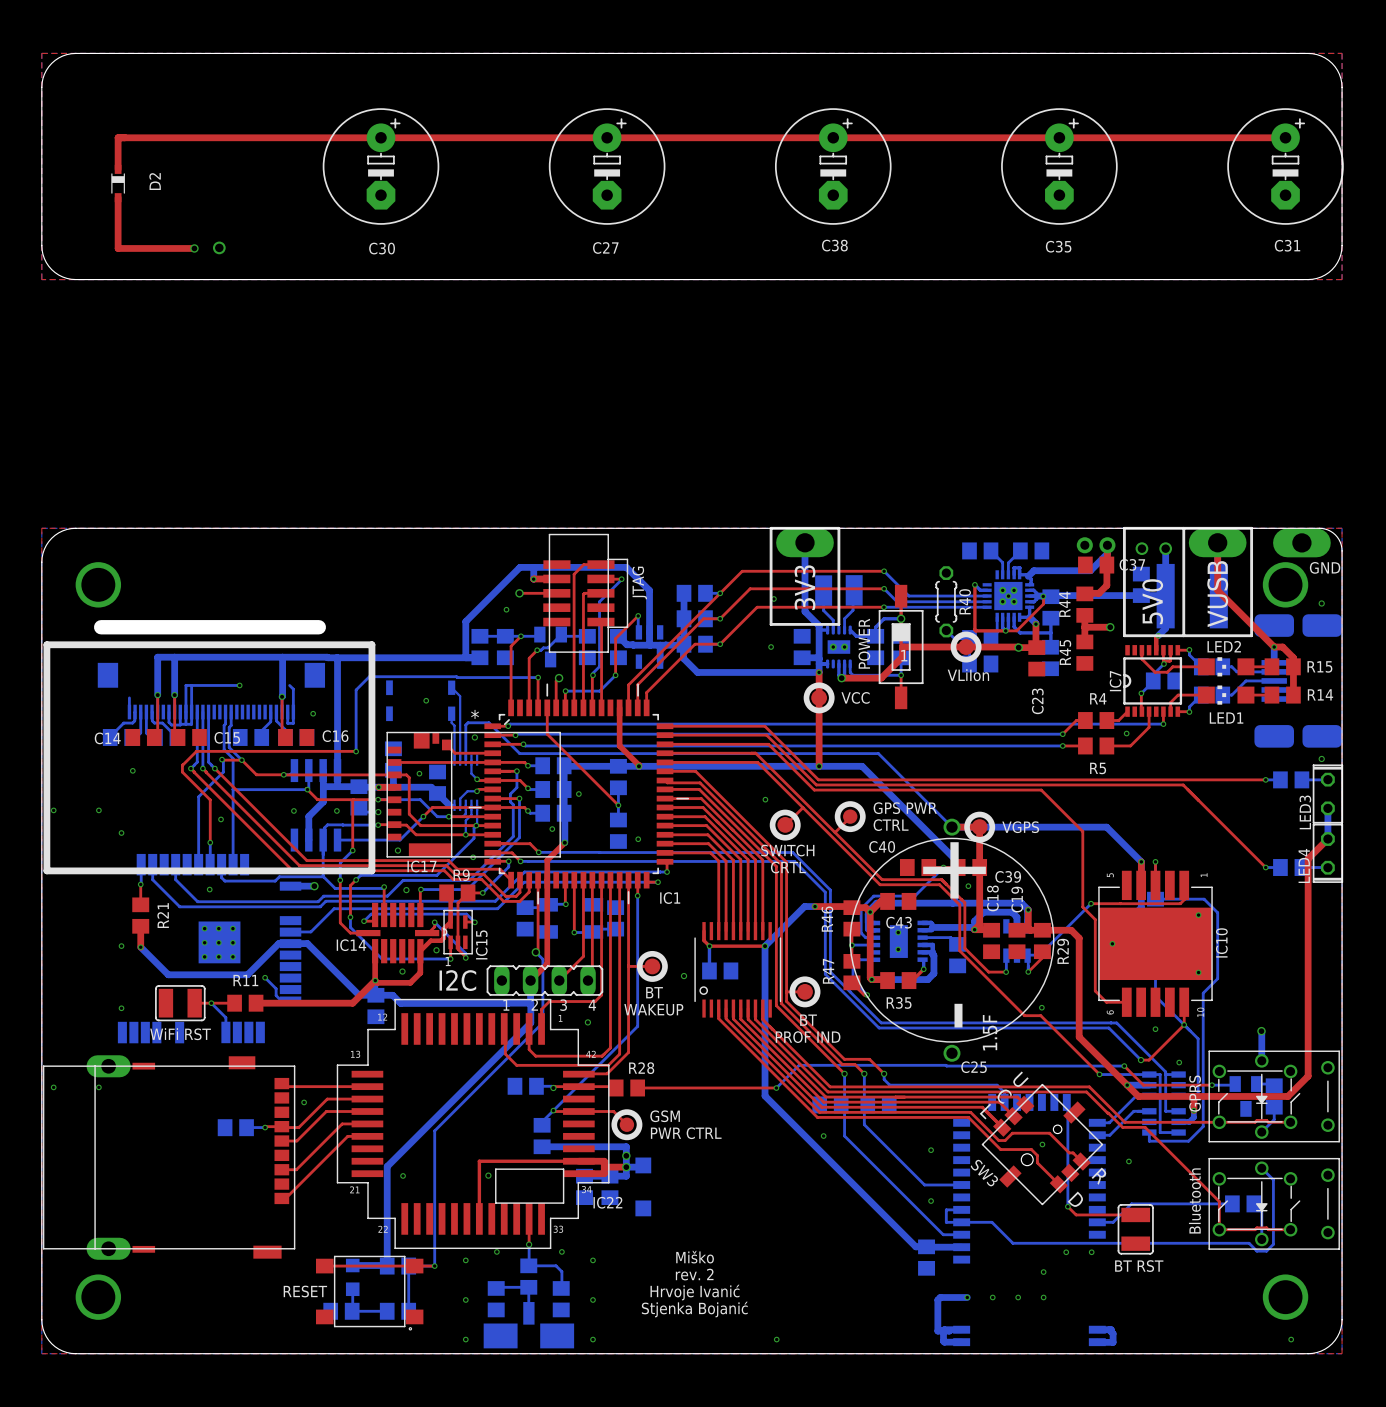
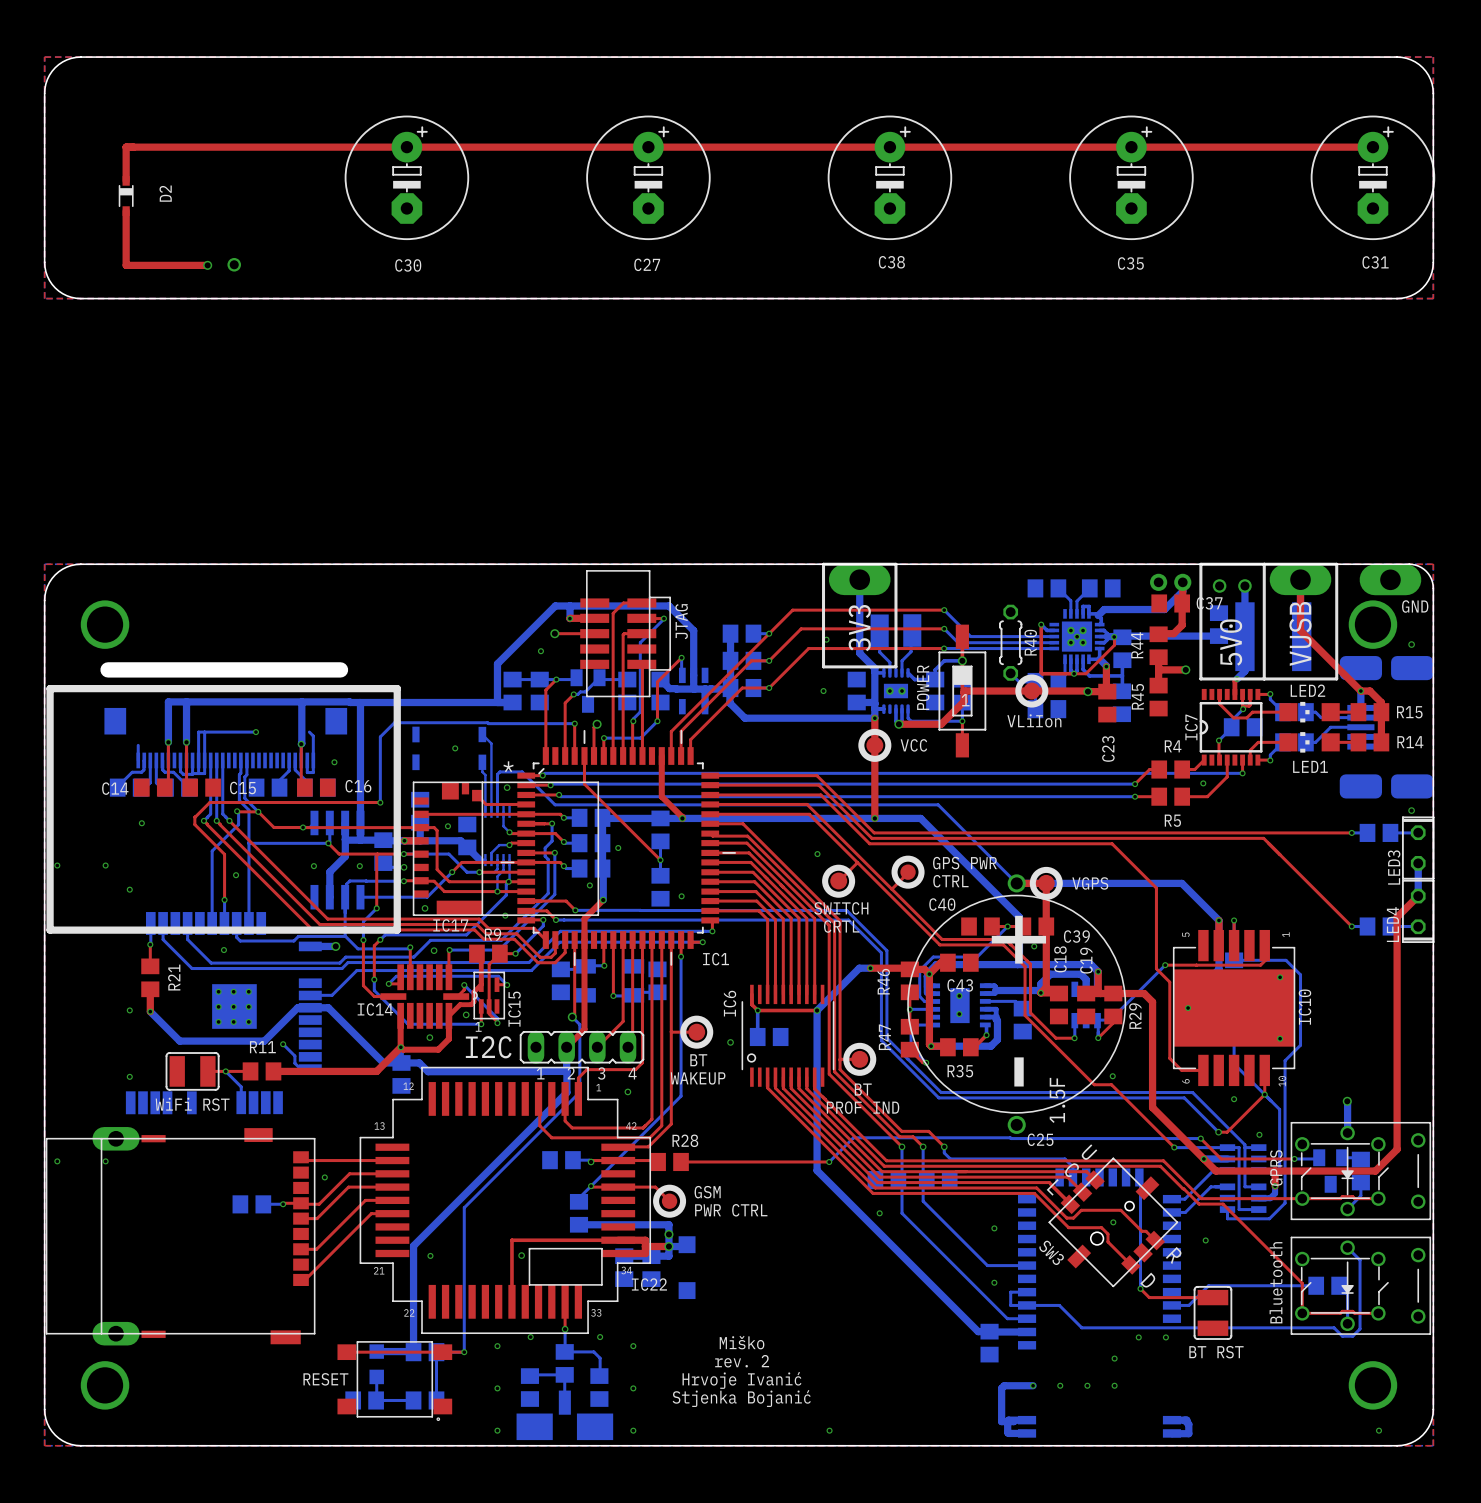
IC6 name: none -> IC6 (729, 1003)

